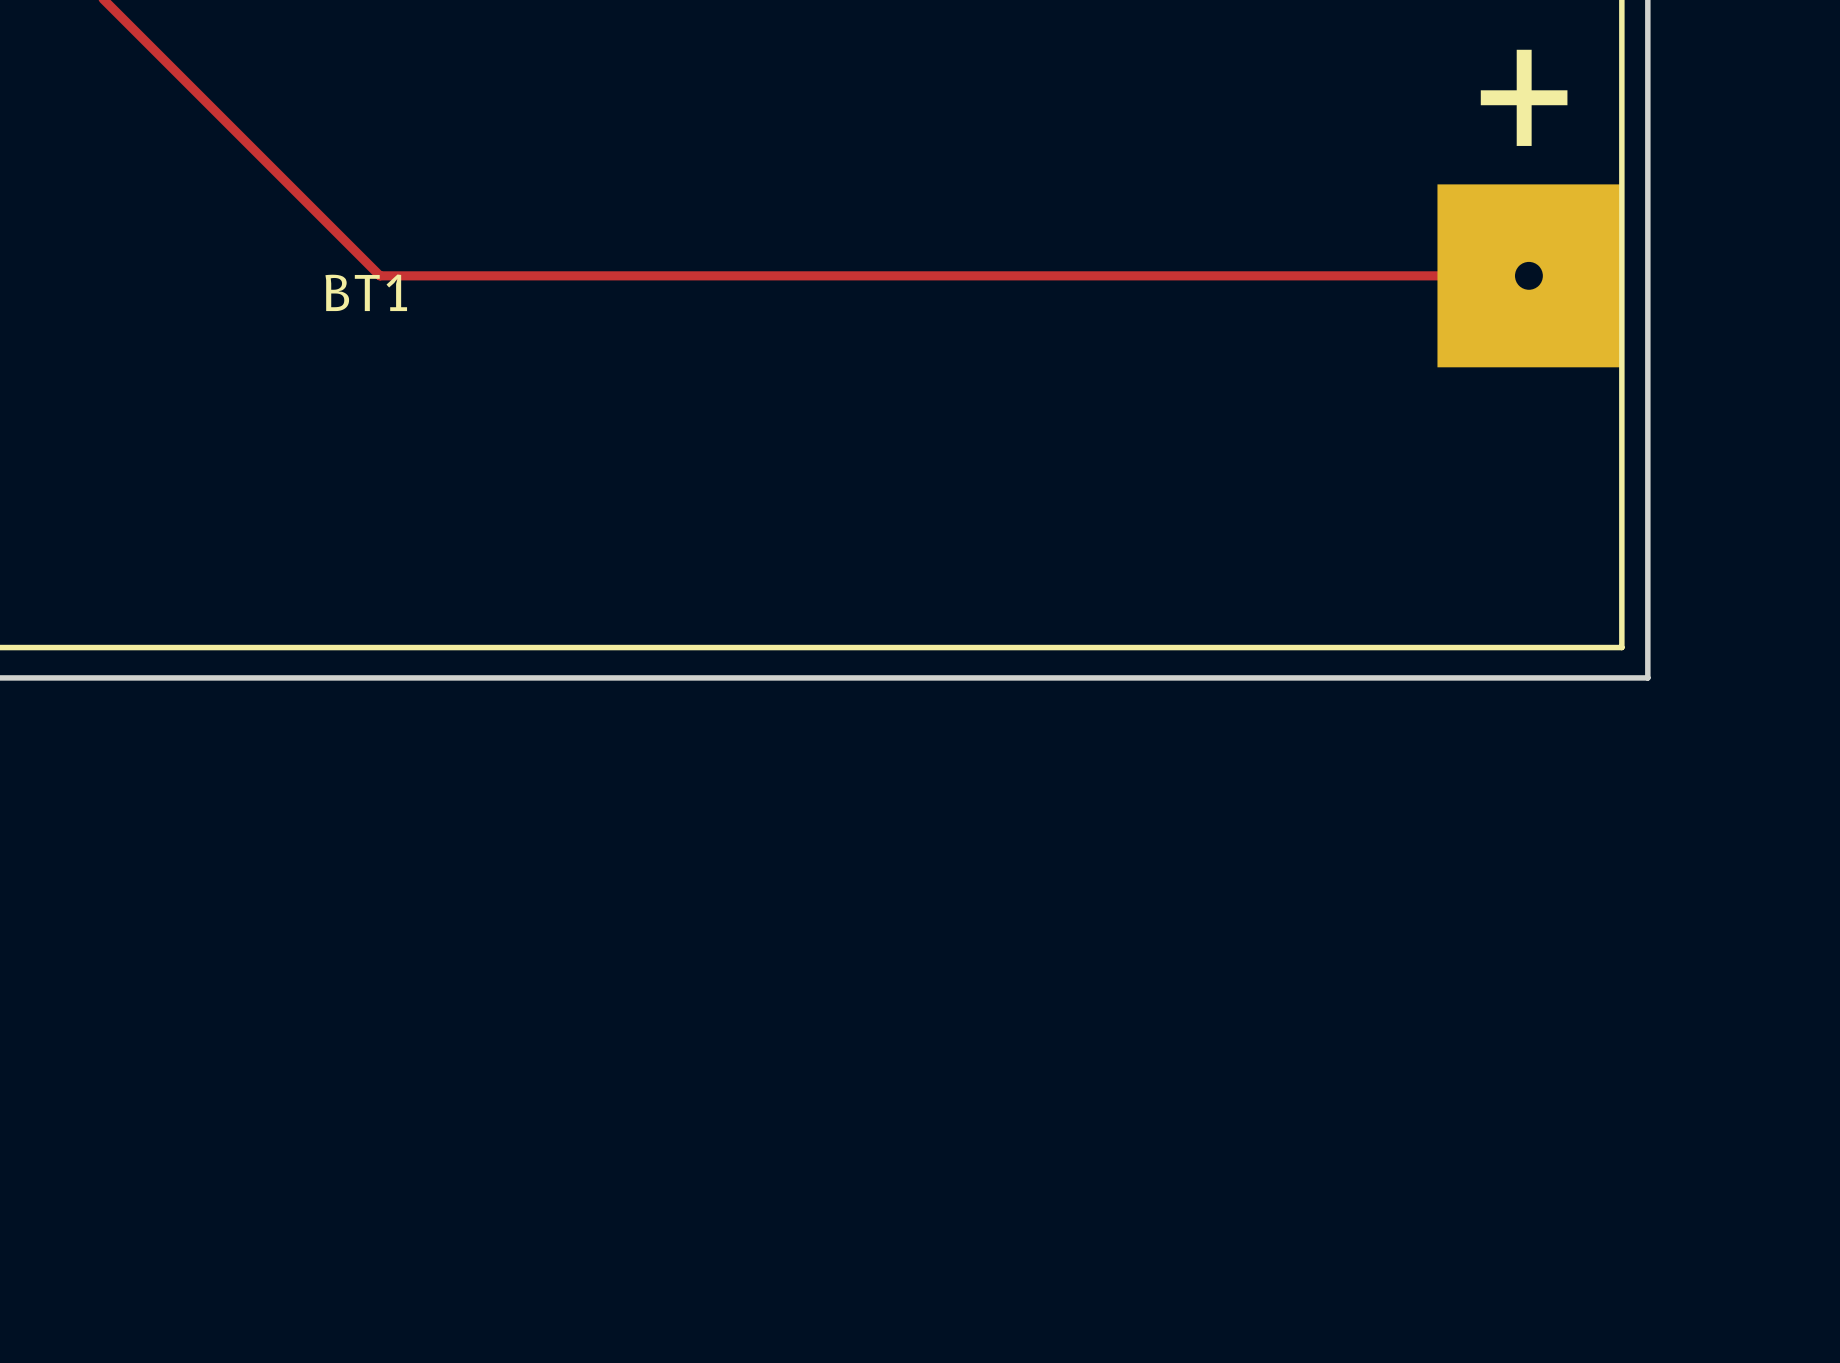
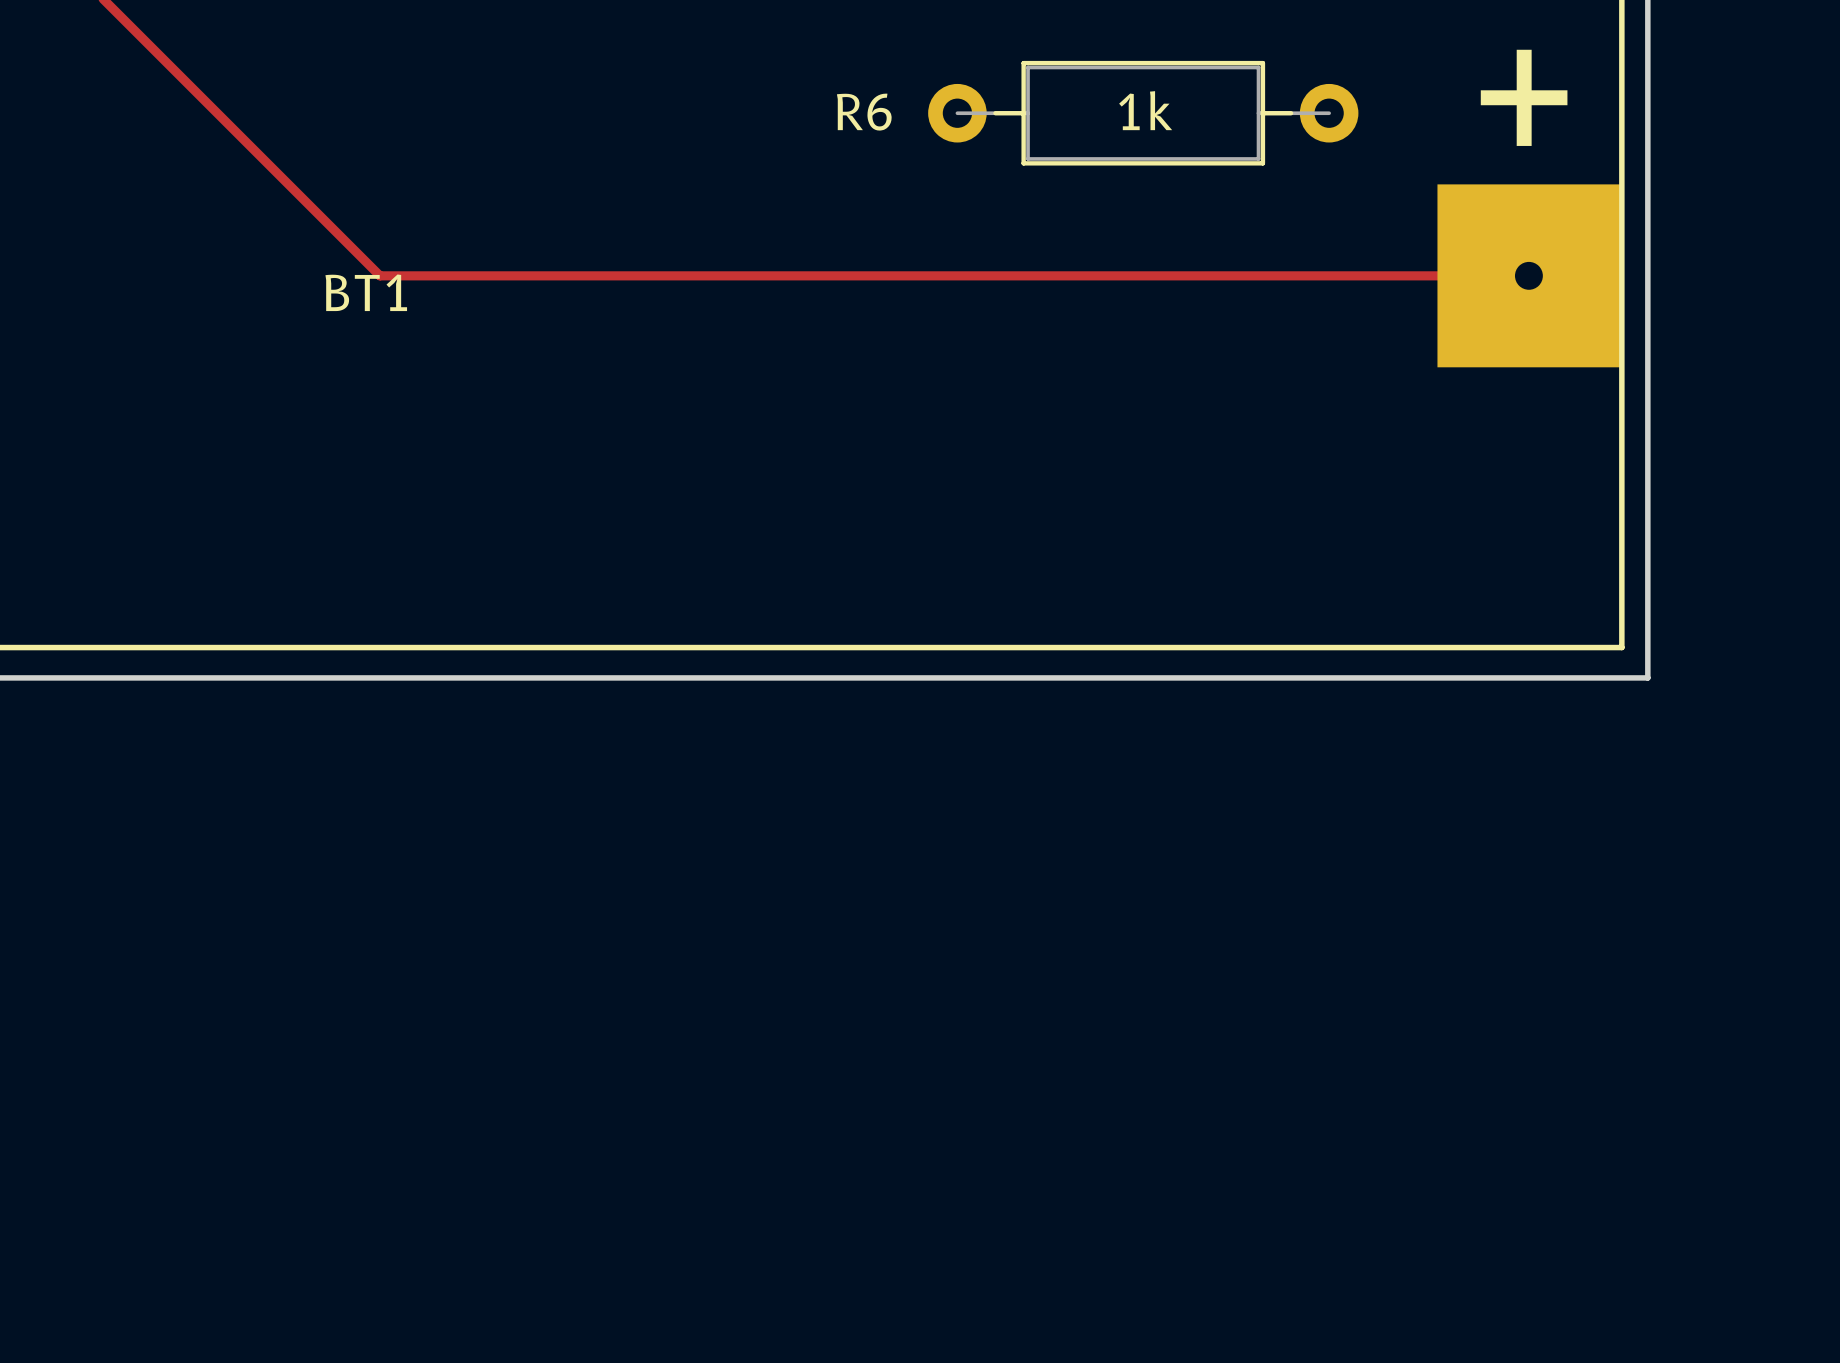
R6: none -> 1k (1143, 113)

